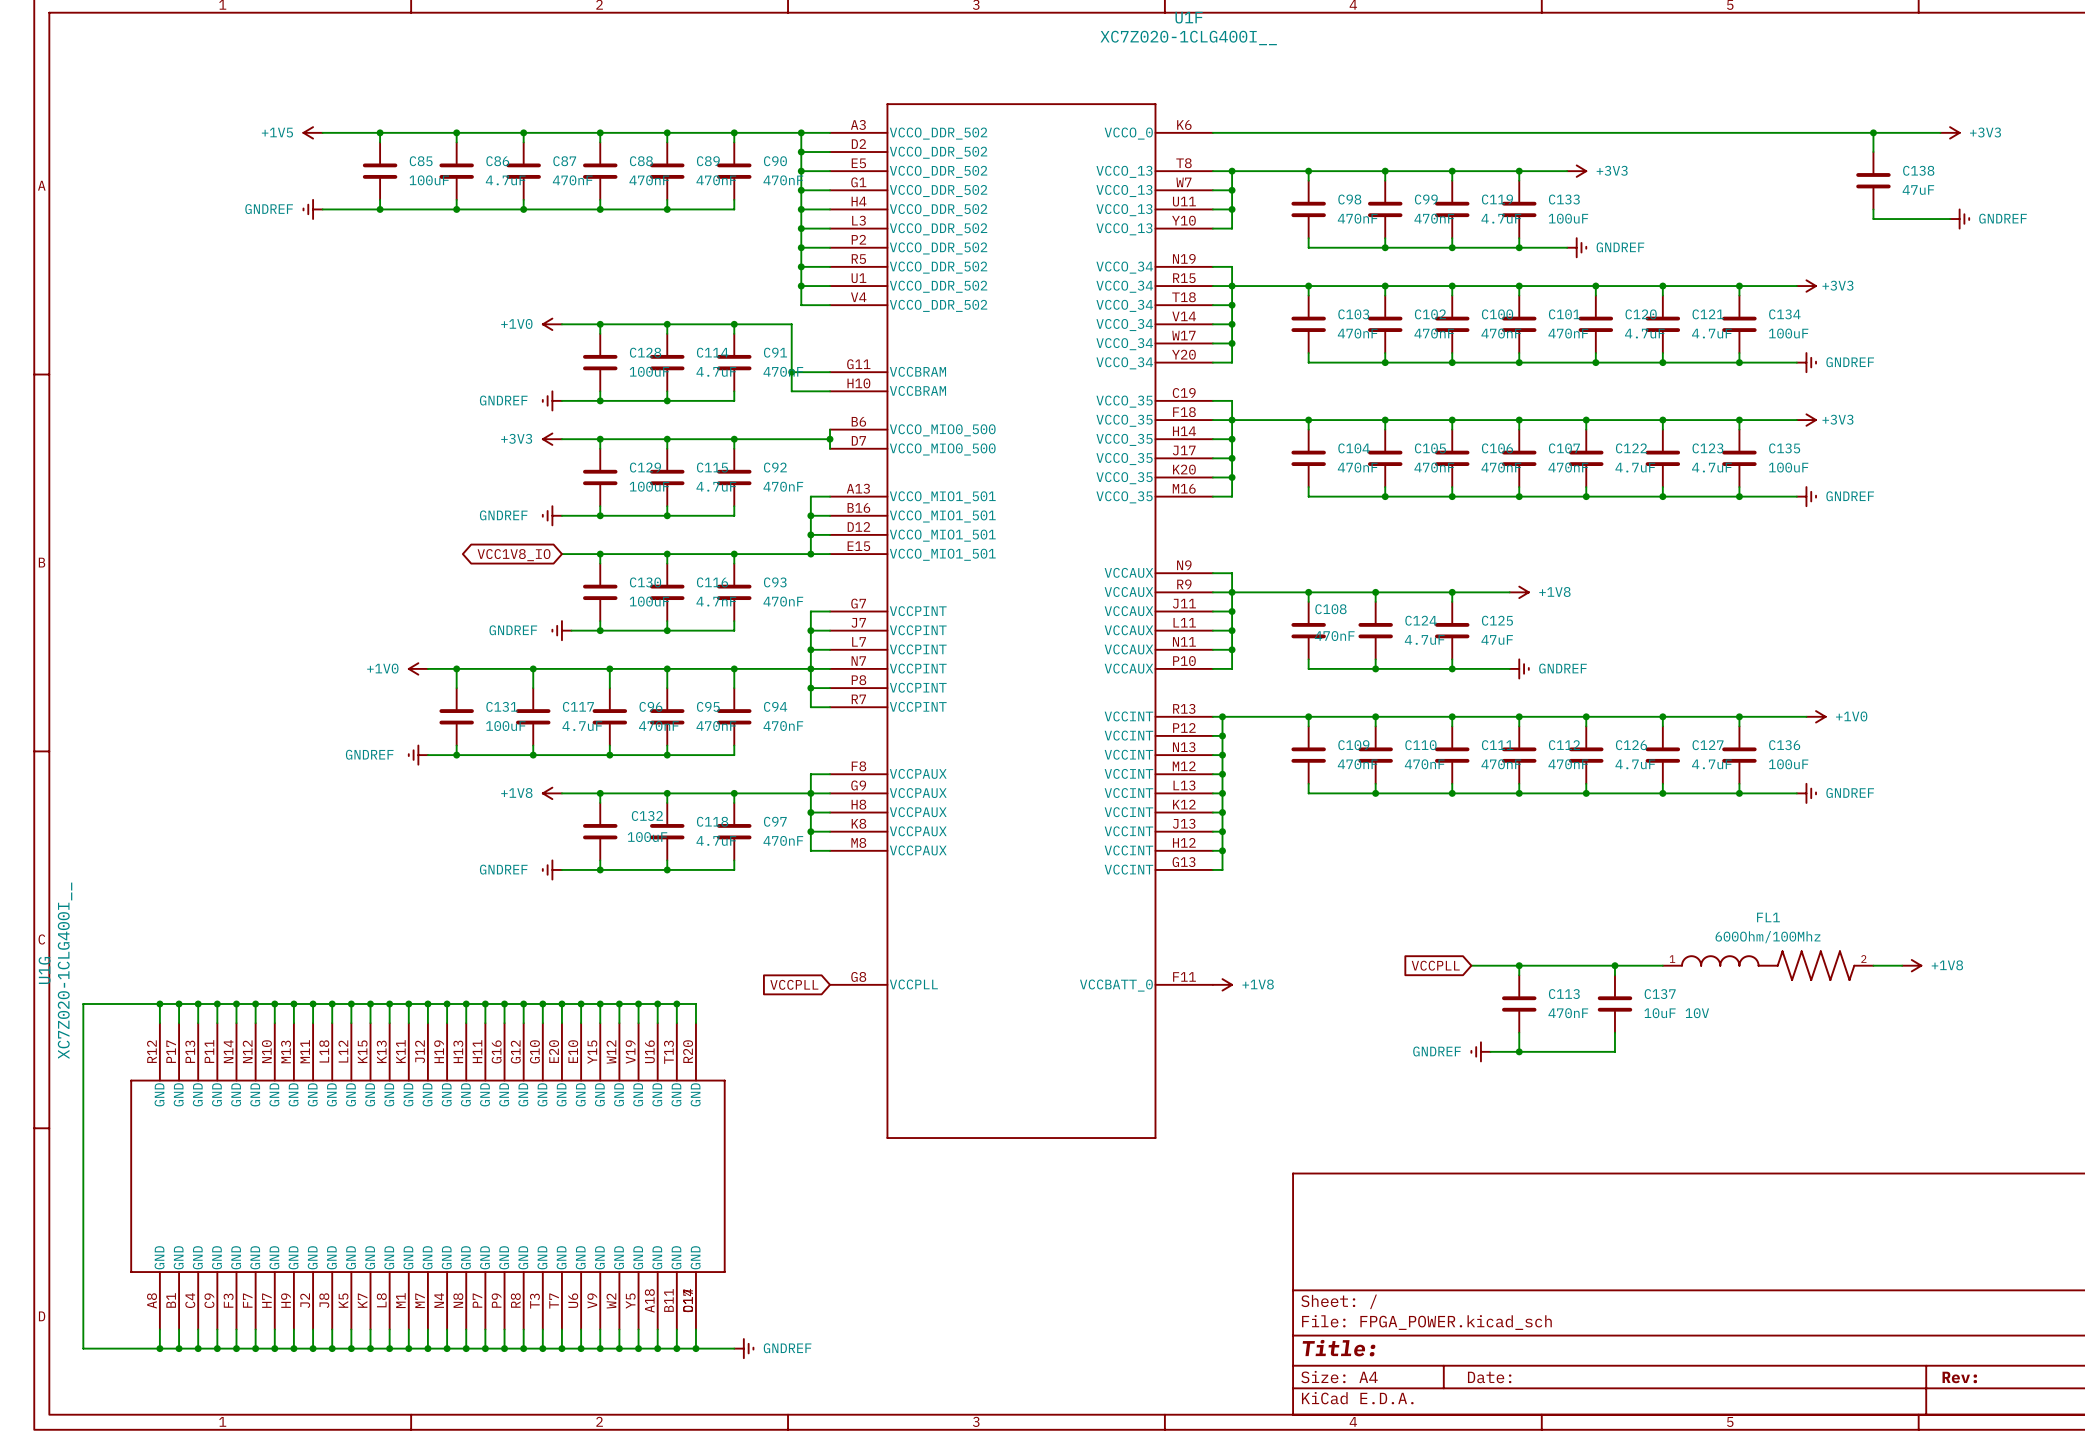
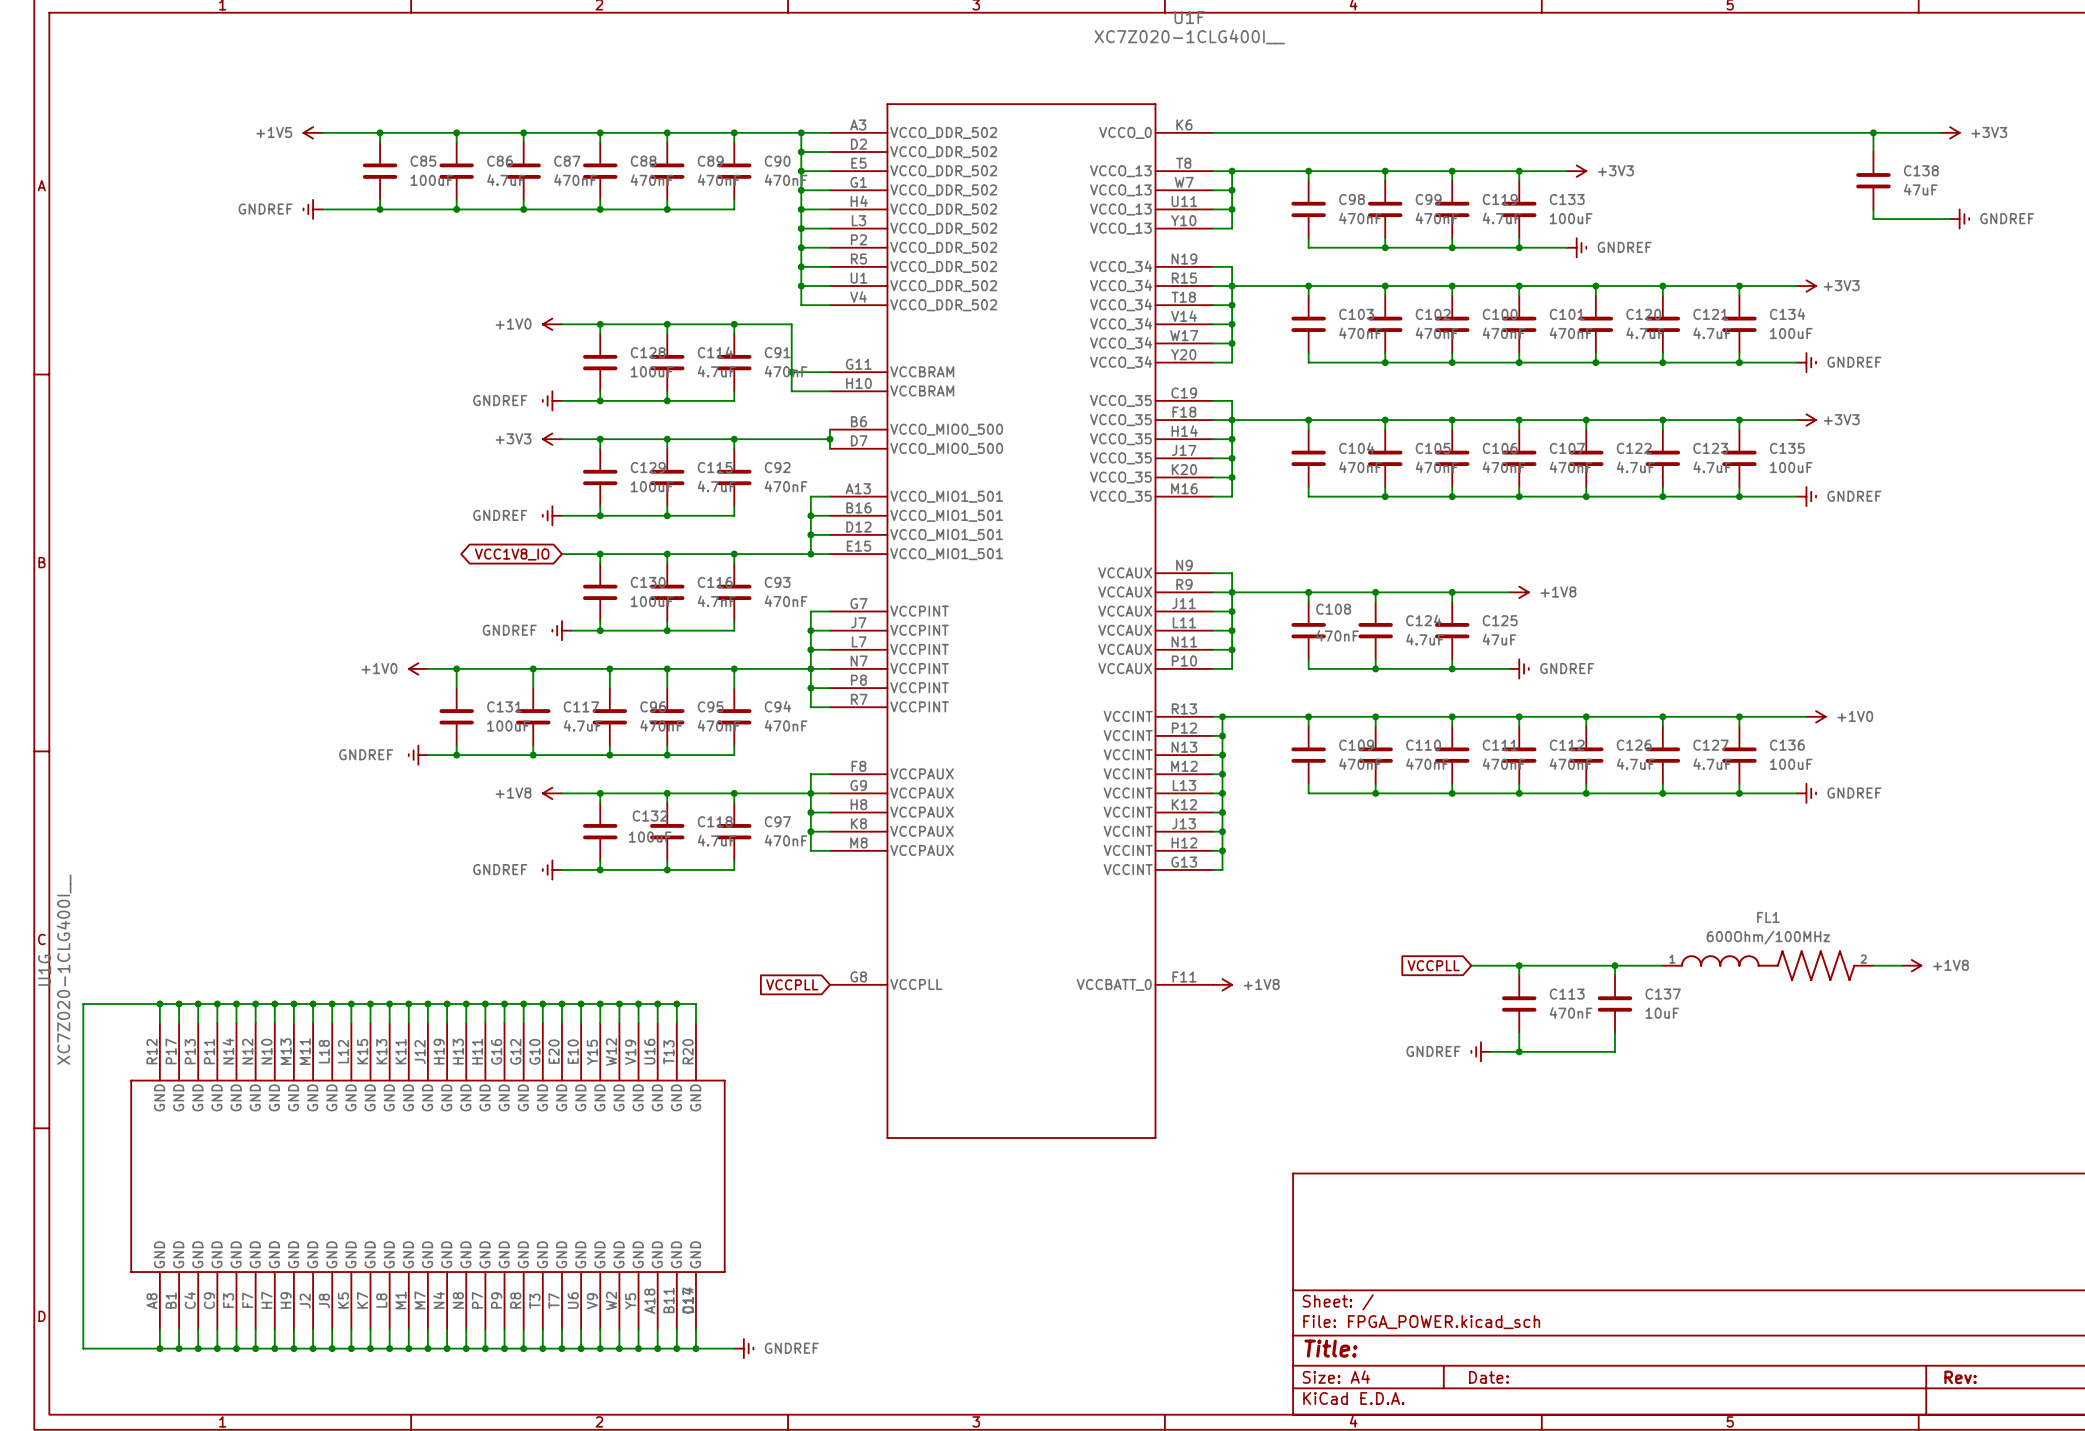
FL1 value: 600Ohm/100Mhz (1768, 937) -> 600Ohm/100MHz (1768, 937)
C137 value: 10uF 10V (1676, 1013) -> 10uF (1662, 1013)

